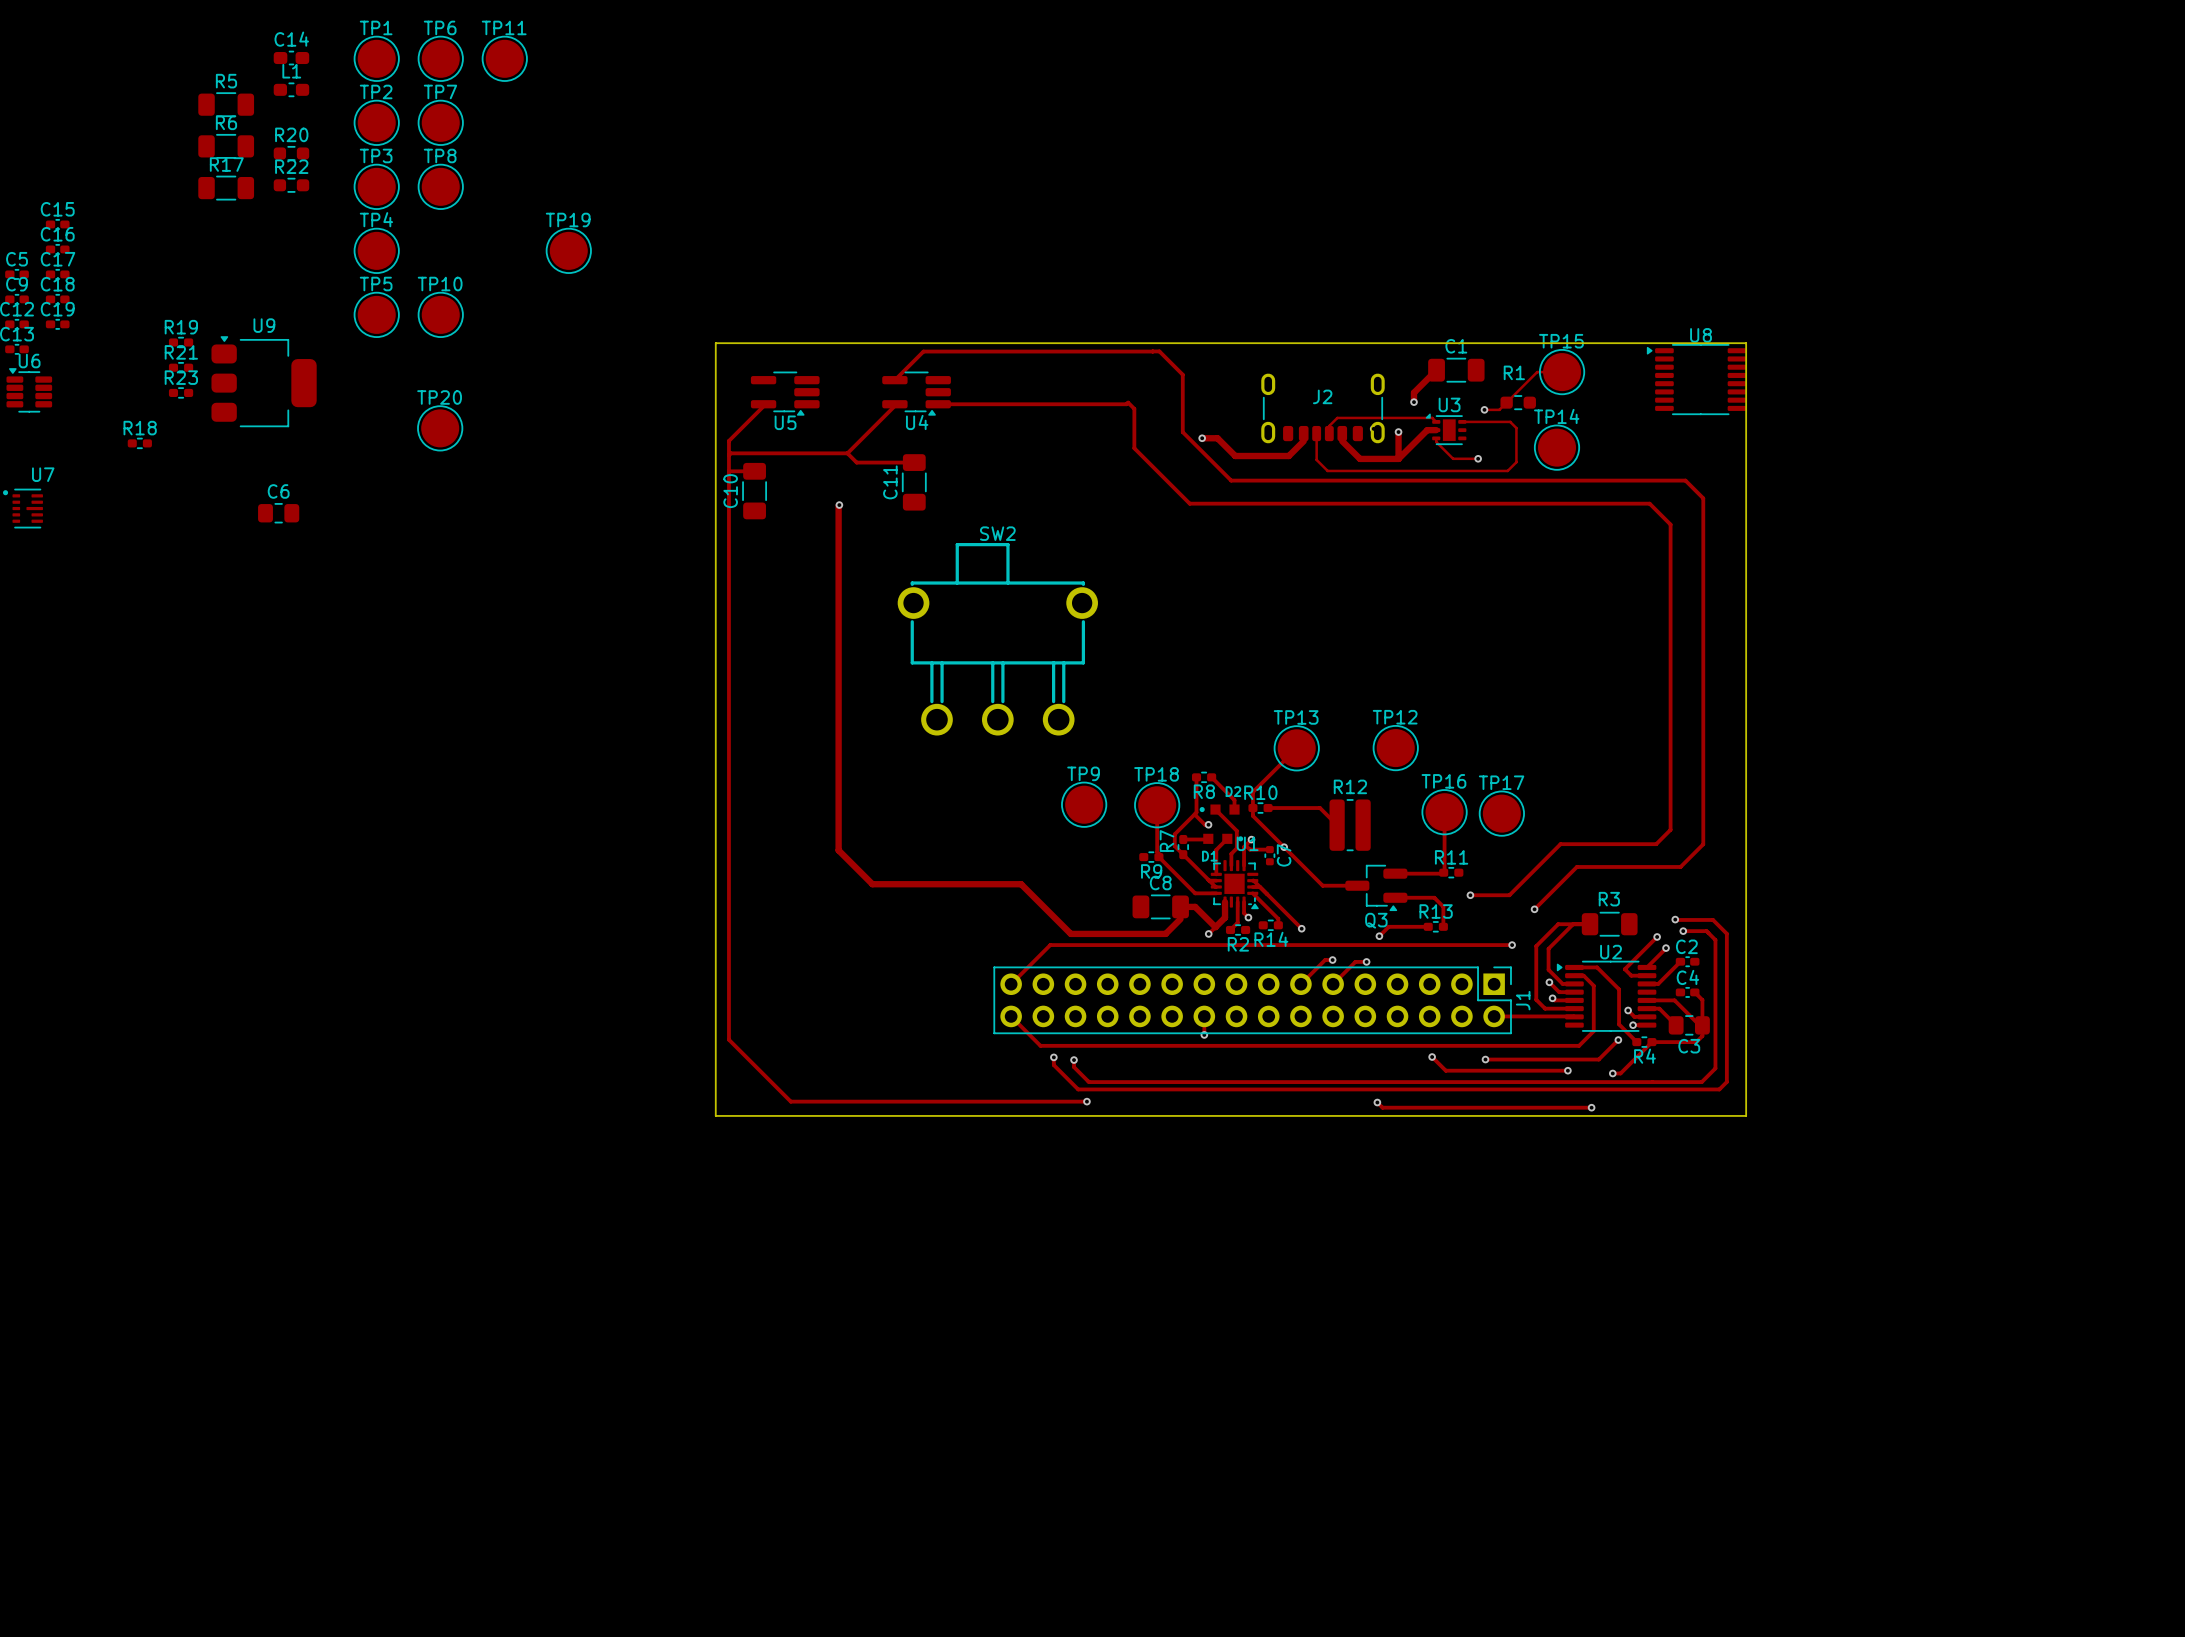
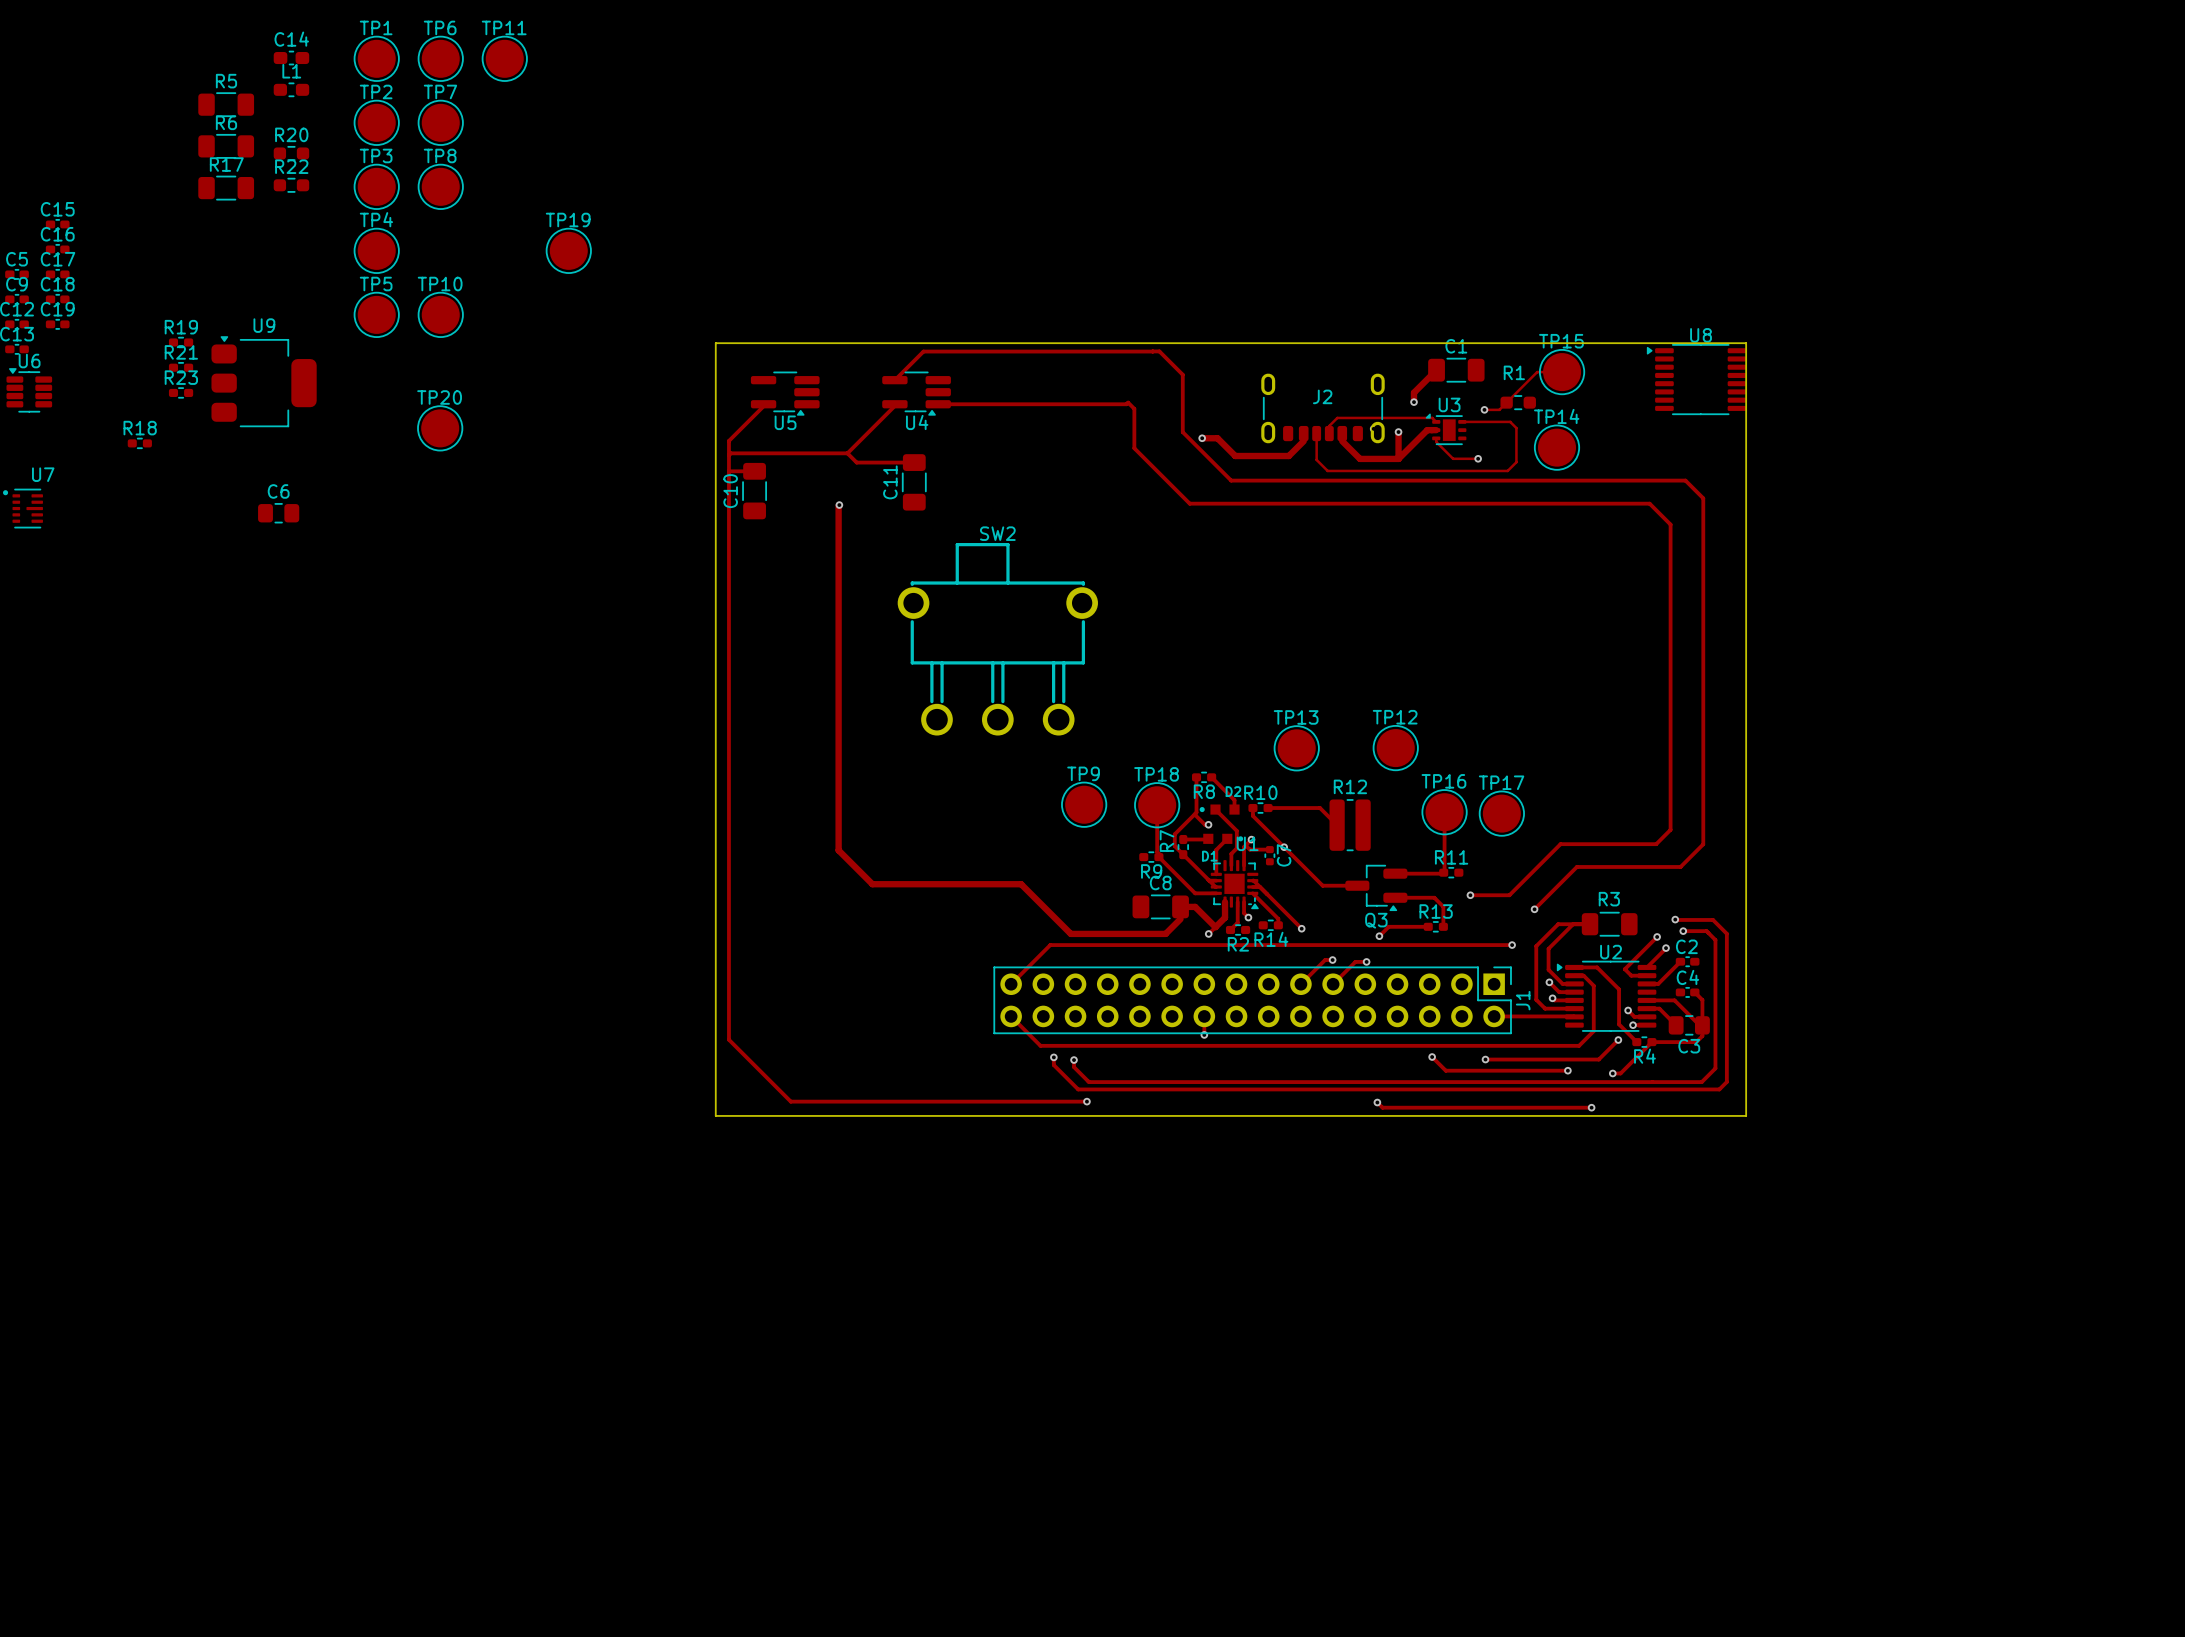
track: (1296, 748) (1252, 792) (1252, 808) -> none

